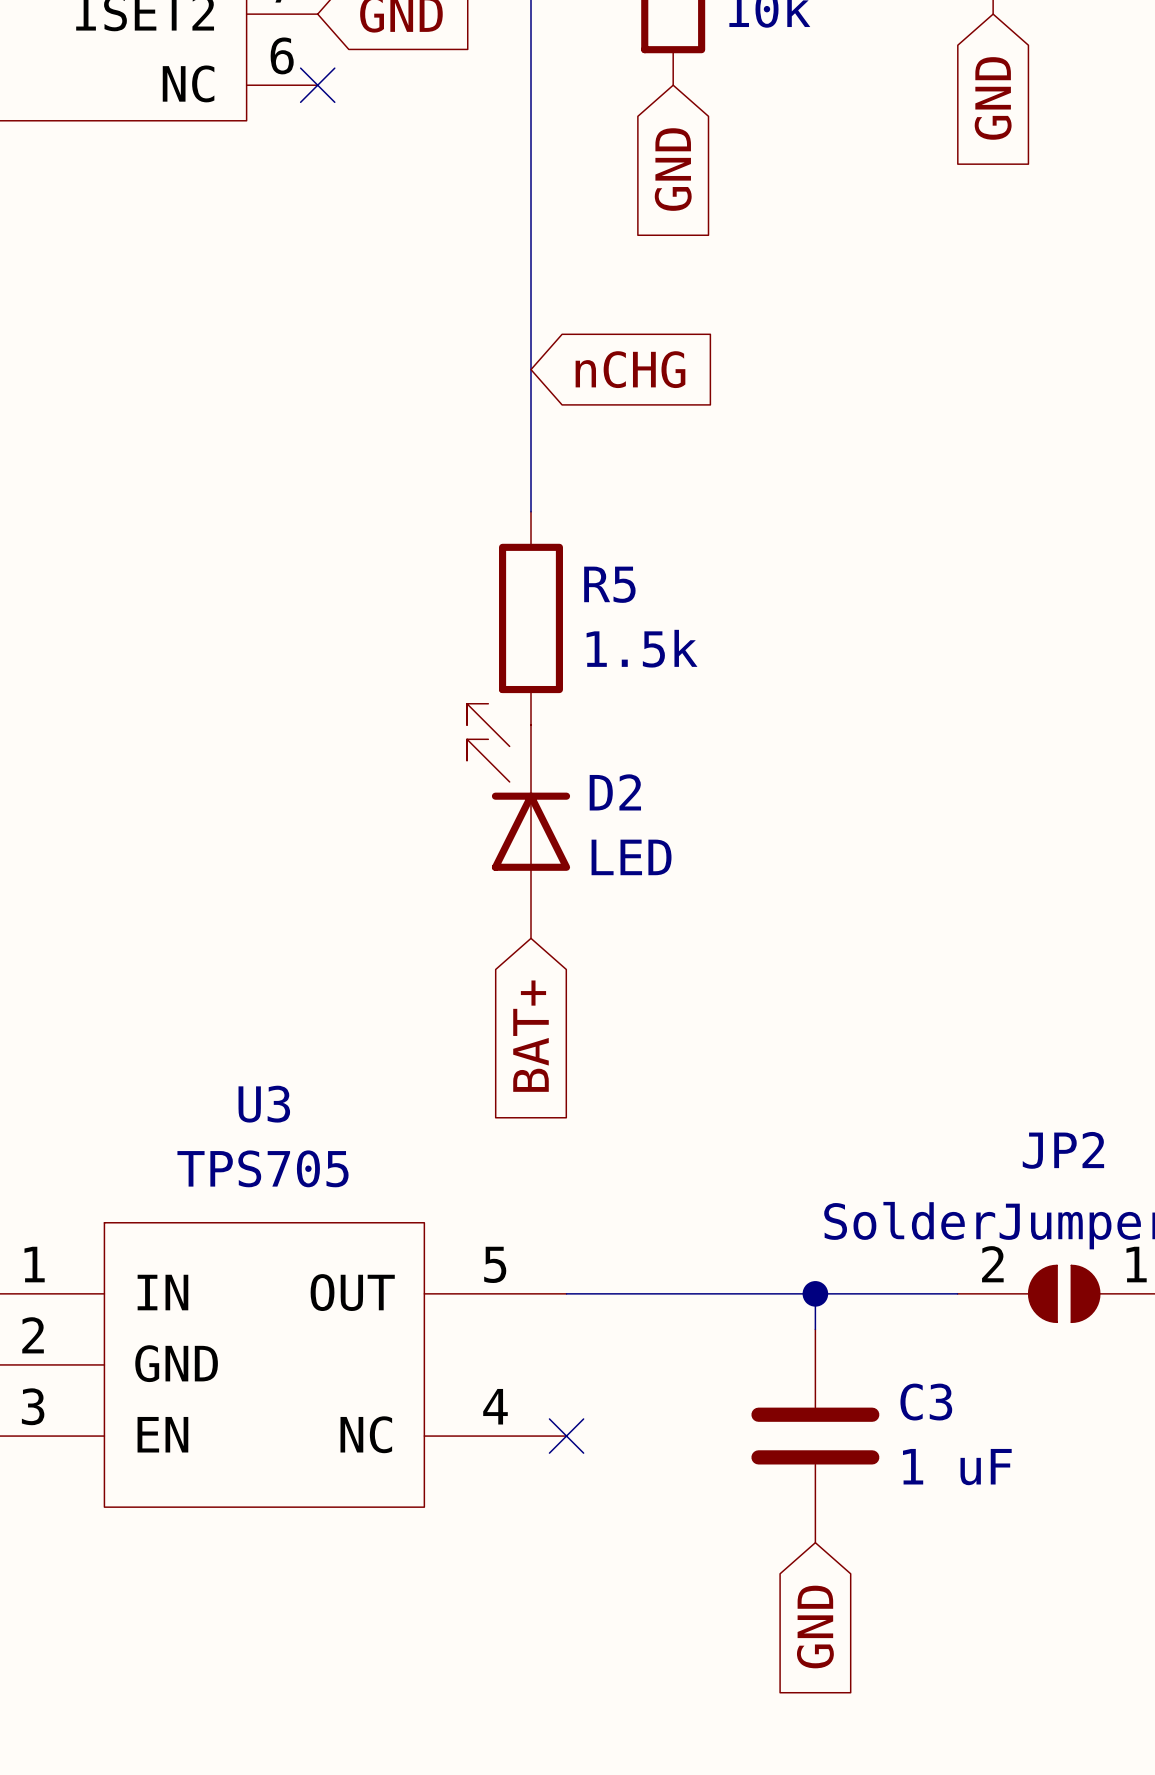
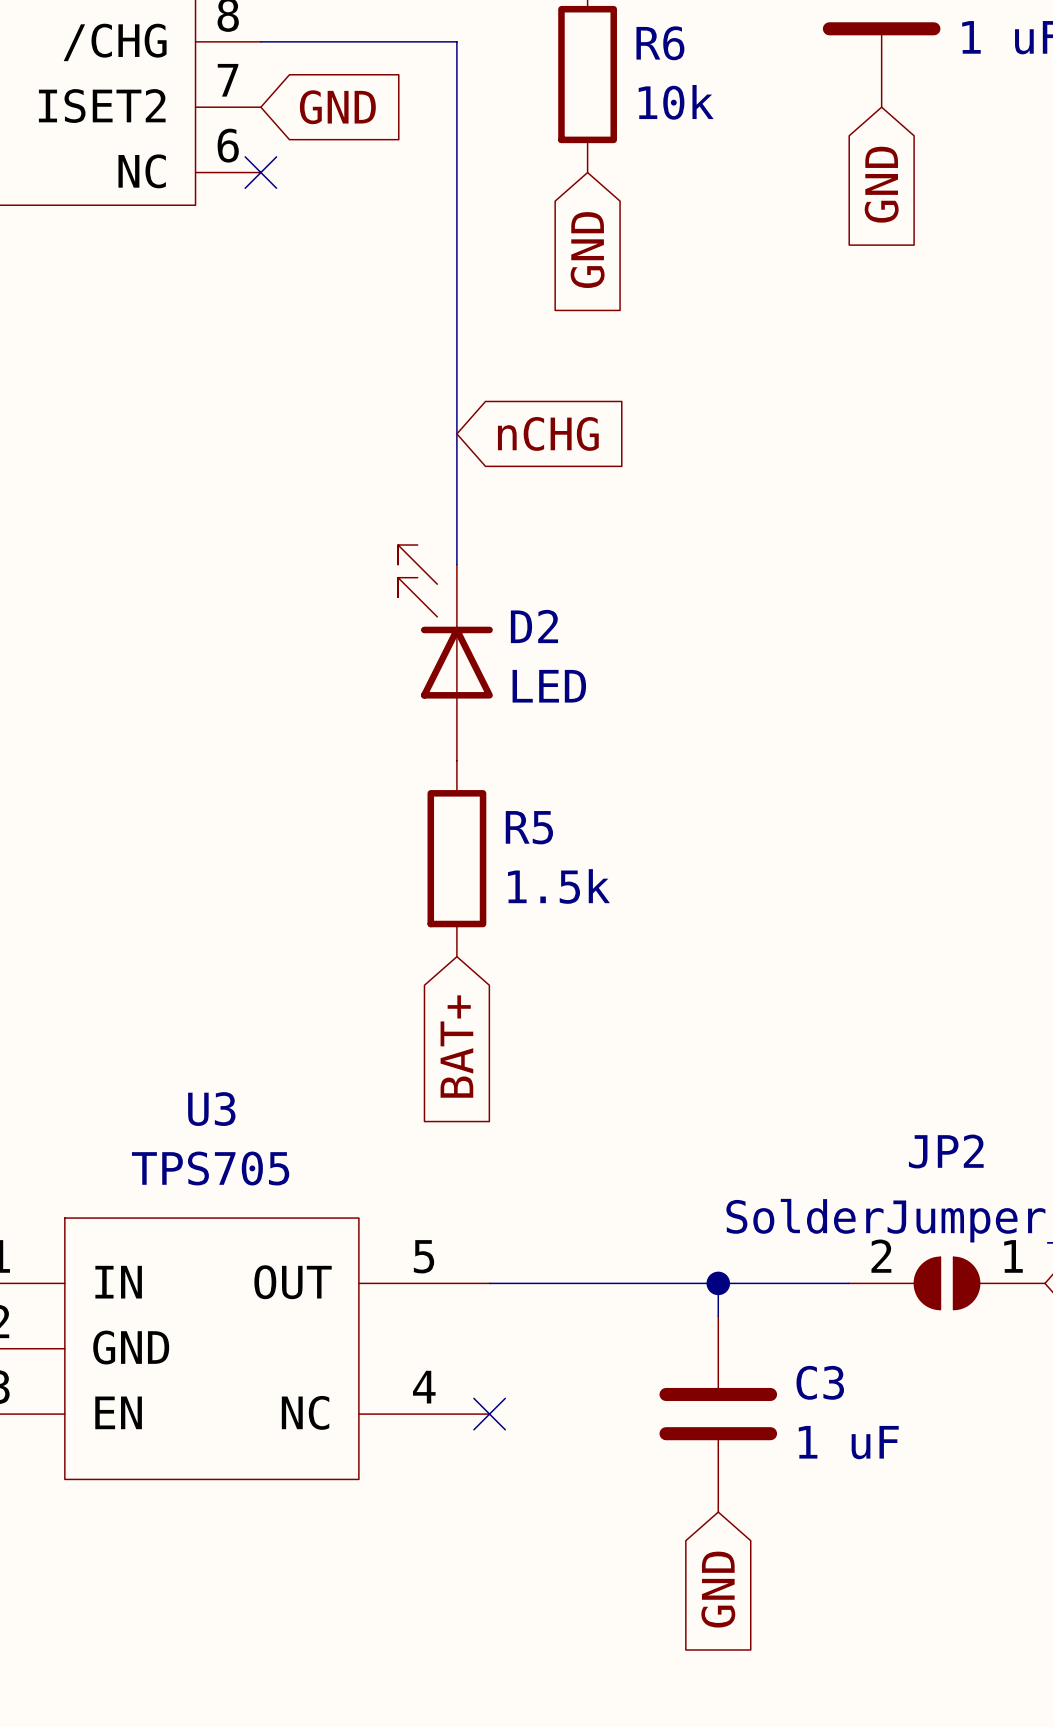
R5 position: (531, 618) -> (456, 858)
D2 position: (518, 821) -> (445, 652)

